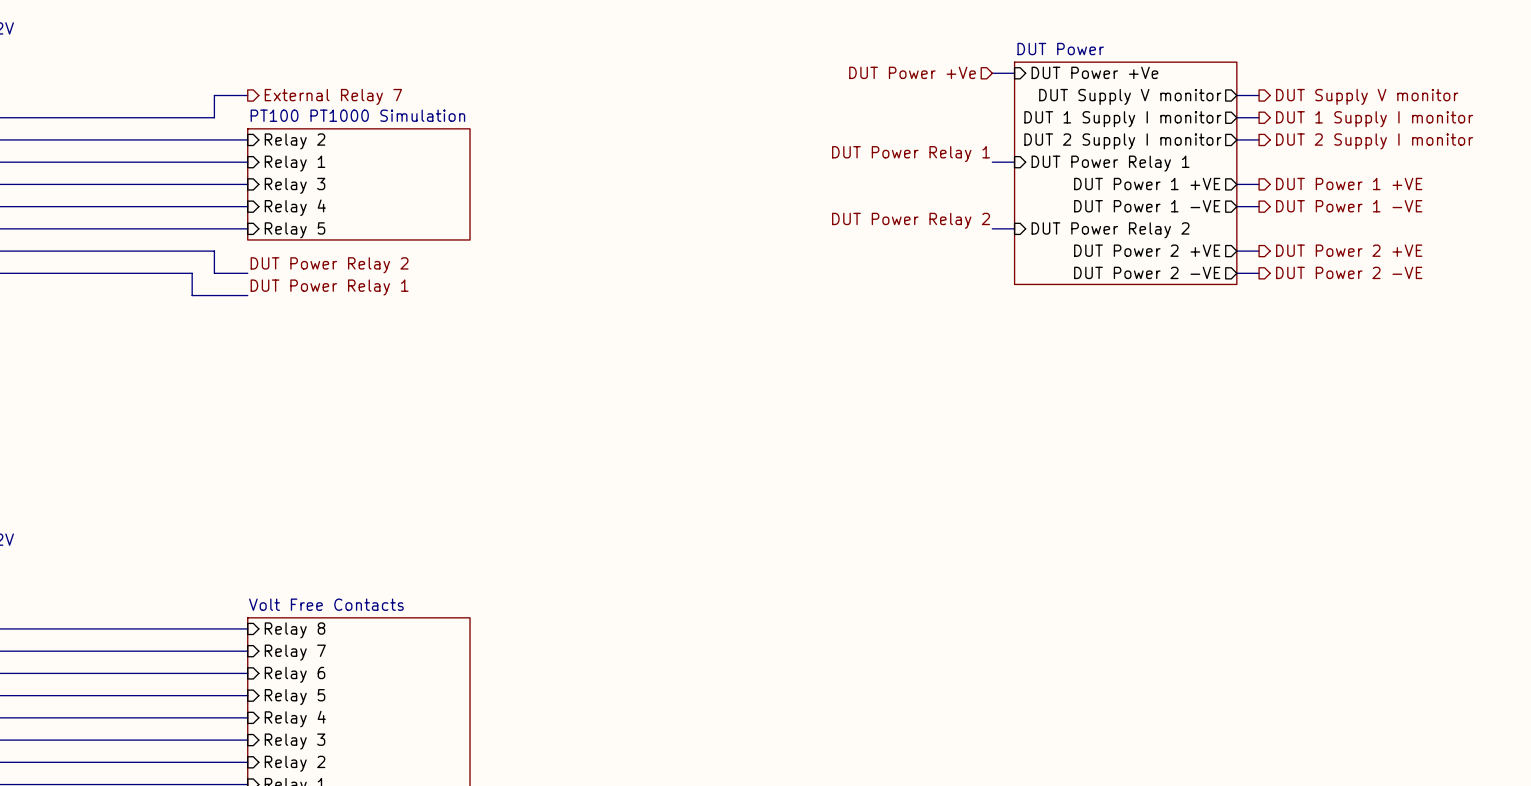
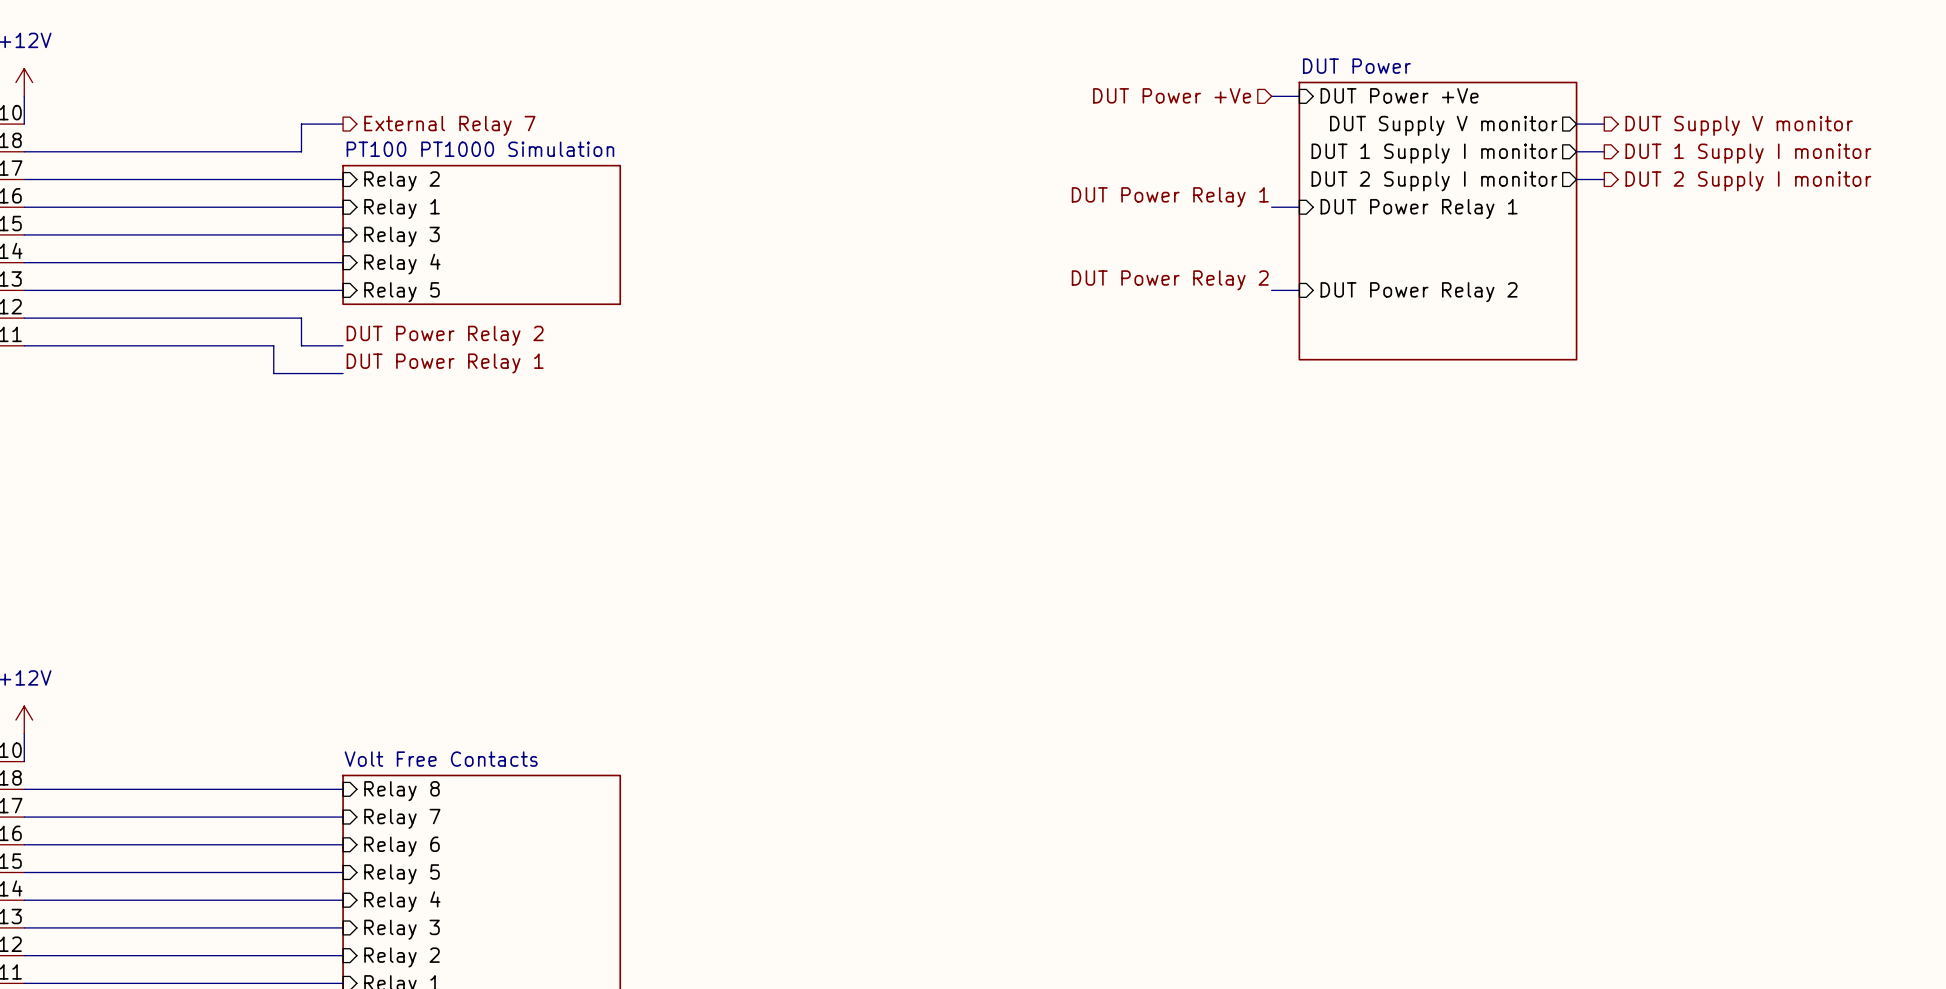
sheet pin: DUT Power 1 +VE (1147, 184) -> none
wire: (1236, 184) (1259, 184) -> none
hierarchical label: DUT Power 1 +VE (1349, 184) -> none
sheet pin: DUT Power 1 -VE (1147, 206) -> none
wire: (1236, 206) (1259, 206) -> none
hierarchical label: DUT Power 1 -VE (1349, 206) -> none
sheet pin: DUT Power 2 +VE (1147, 250) -> none
hierarchical label: DUT Power 2 +VE (1349, 250) -> none
wire: (1236, 251) (1259, 251) -> none
sheet pin: DUT Power 2 -VE (1147, 272) -> none
hierarchical label: DUT Power 2 -VE (1349, 272) -> none
wire: (1236, 273) (1259, 273) -> none

